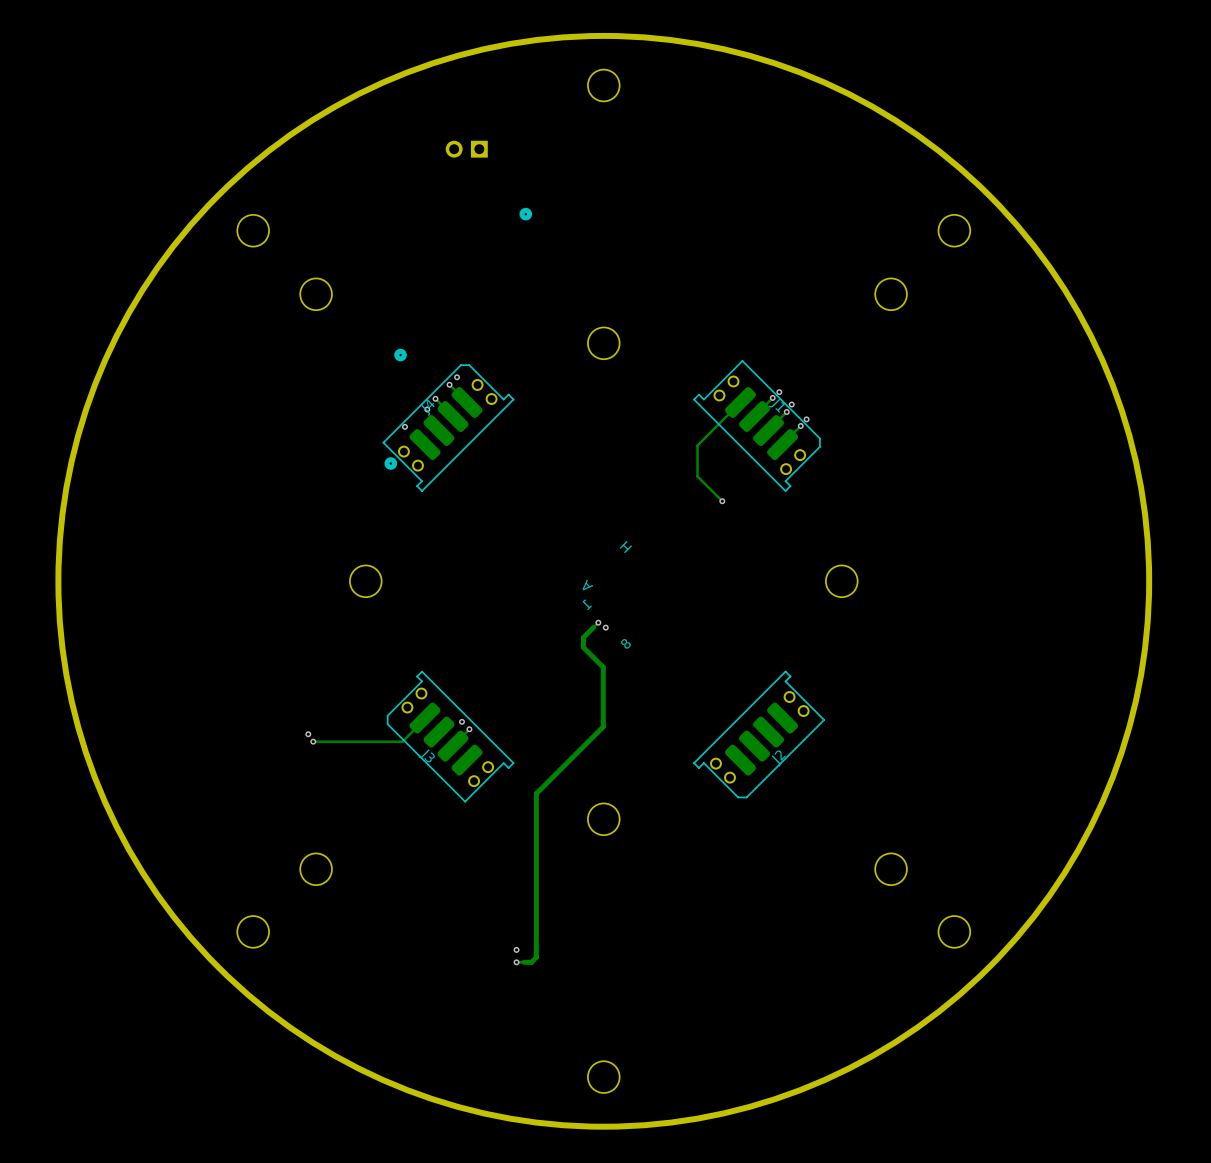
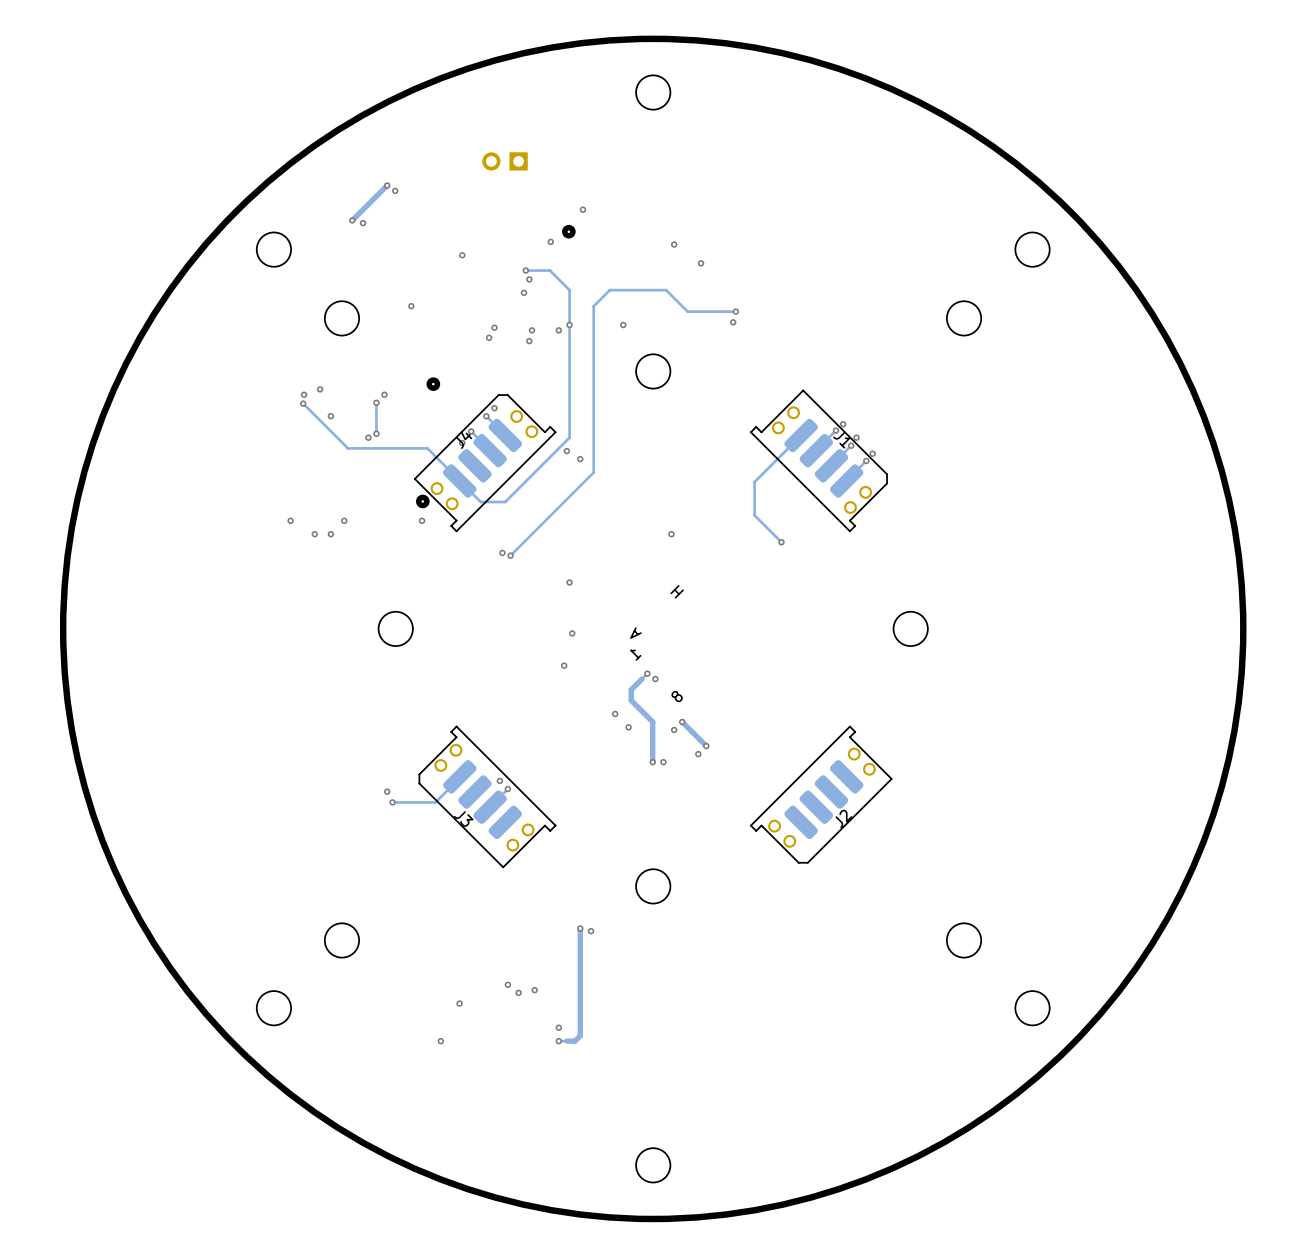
track: none -> (387, 185) (352, 220)
via: none -> (387, 185)
via: none -> (395, 190)
via: none -> (582, 209)
via: none -> (352, 220)
via: none -> (363, 223)
via: none -> (550, 241)
via: none -> (674, 244)
via: none -> (462, 255)
via: none -> (701, 263)
track: none -> (525, 270) (549, 270) (569, 290) (569, 437) (505, 502) (480, 502) (459, 480)
via: none -> (525, 270)
via: none -> (529, 279)
via: none -> (523, 292)
via: none -> (411, 306)
track: none -> (735, 311) (687, 311) (666, 290) (609, 290) (593, 306) (593, 472) (510, 555)
via: none -> (735, 311)
via: none -> (733, 322)
via: none -> (569, 325)
via: none -> (623, 325)
via: none -> (494, 327)
via: none -> (532, 330)
via: none -> (558, 330)
via: none -> (489, 337)
via: none -> (529, 341)
via: none -> (320, 389)
via: none -> (304, 394)
via: none -> (384, 394)
track: none -> (376, 402) (376, 433)
via: none -> (376, 402)
track: none -> (303, 403) (347, 448) (427, 448) (459, 480)
via: none -> (303, 403)
via: none -> (330, 416)
via: none -> (376, 433)
via: none -> (368, 437)
via: none -> (566, 451)
via: none -> (580, 459)
via: (404, 426) -> none
via: none -> (290, 520)
via: none -> (344, 520)
via: none -> (422, 520)
via: none -> (314, 534)
via: none -> (330, 534)
via: none -> (671, 534)
via: none -> (502, 552)
via: none -> (510, 555)
via: none -> (569, 582)
via: none -> (572, 633)
via: none -> (564, 665)
via: none -> (615, 713)
track: none -> (682, 721) (706, 746)
via: none -> (682, 721)
via: none -> (628, 727)
via: none -> (674, 730)
via: none -> (706, 746)
via: none -> (698, 754)
track: (603, 704) (603, 726) (536, 793) (536, 858) -> none
via: none -> (652, 762)
via: none -> (663, 762)
via: none -> (387, 791)
via: (308, 734) -> none
via: (313, 741) -> none
track: (362, 741) (313, 741) -> none
via: none -> (392, 802)
via: none -> (580, 928)
via: none -> (591, 931)
via: none -> (507, 984)
via: none -> (534, 990)
via: none -> (518, 992)
via: none -> (459, 1003)
via: none -> (440, 1041)

